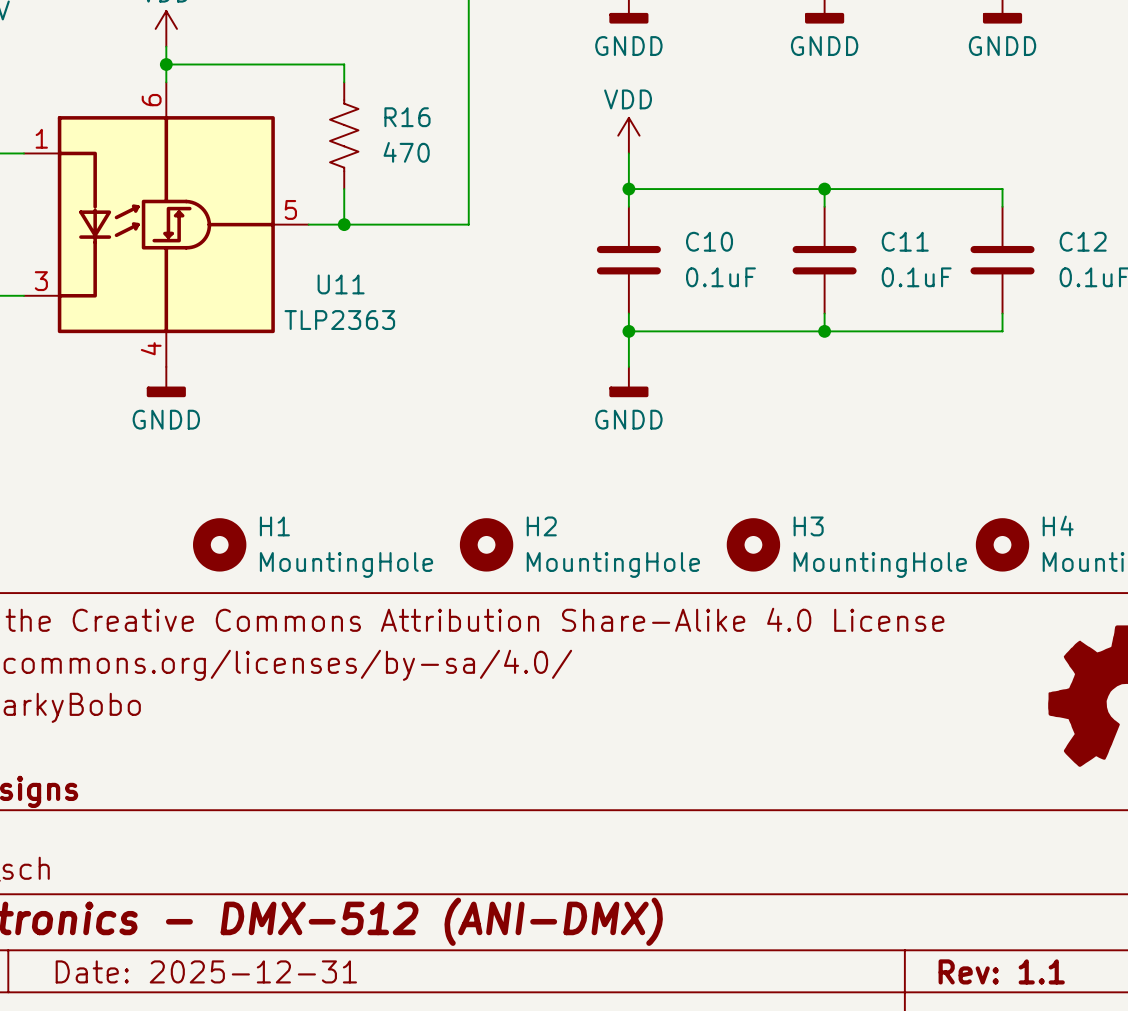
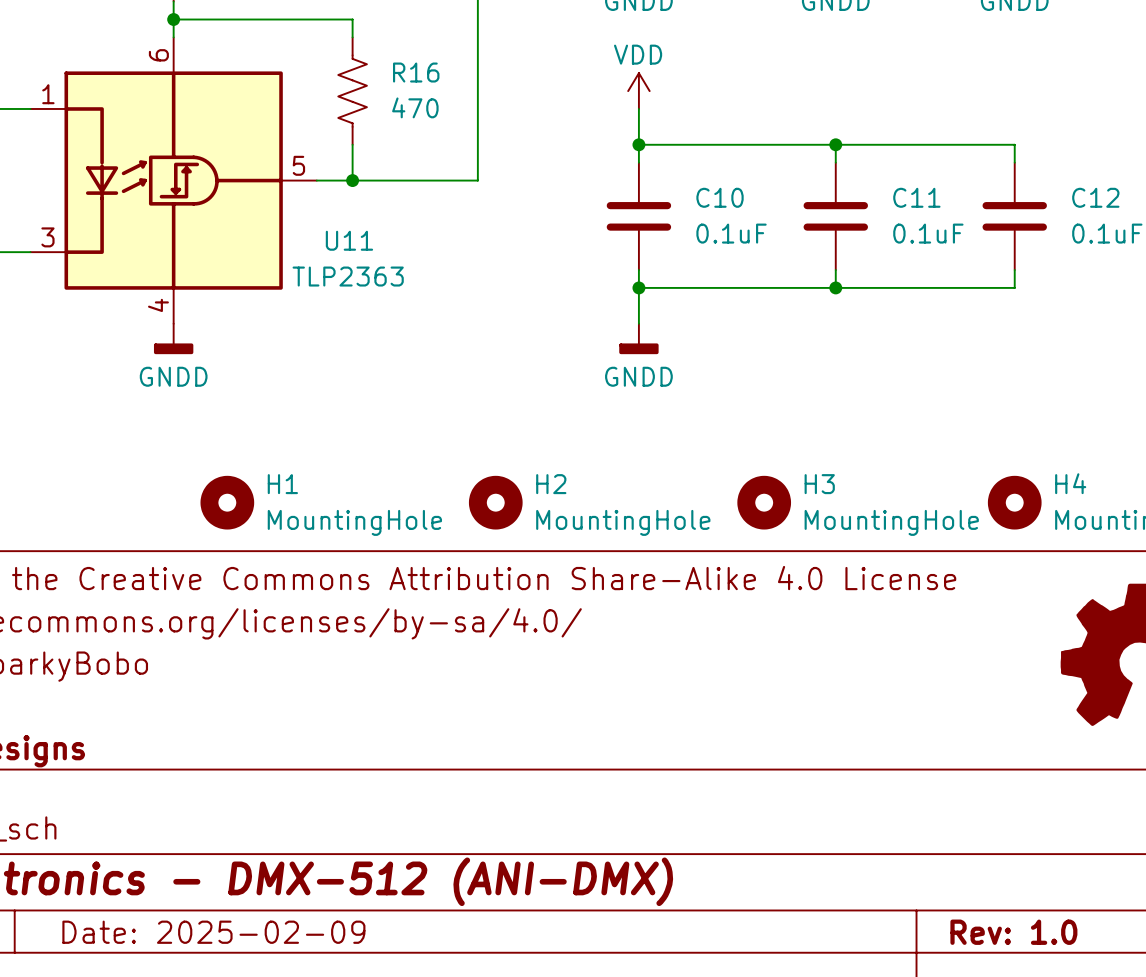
title block: Date: 2025-12-31 (206, 971) -> Date: 2025-02-09 (213, 932)
title block: Rev: 1.1 (1001, 971) -> Rev: 1.0 (1013, 932)

